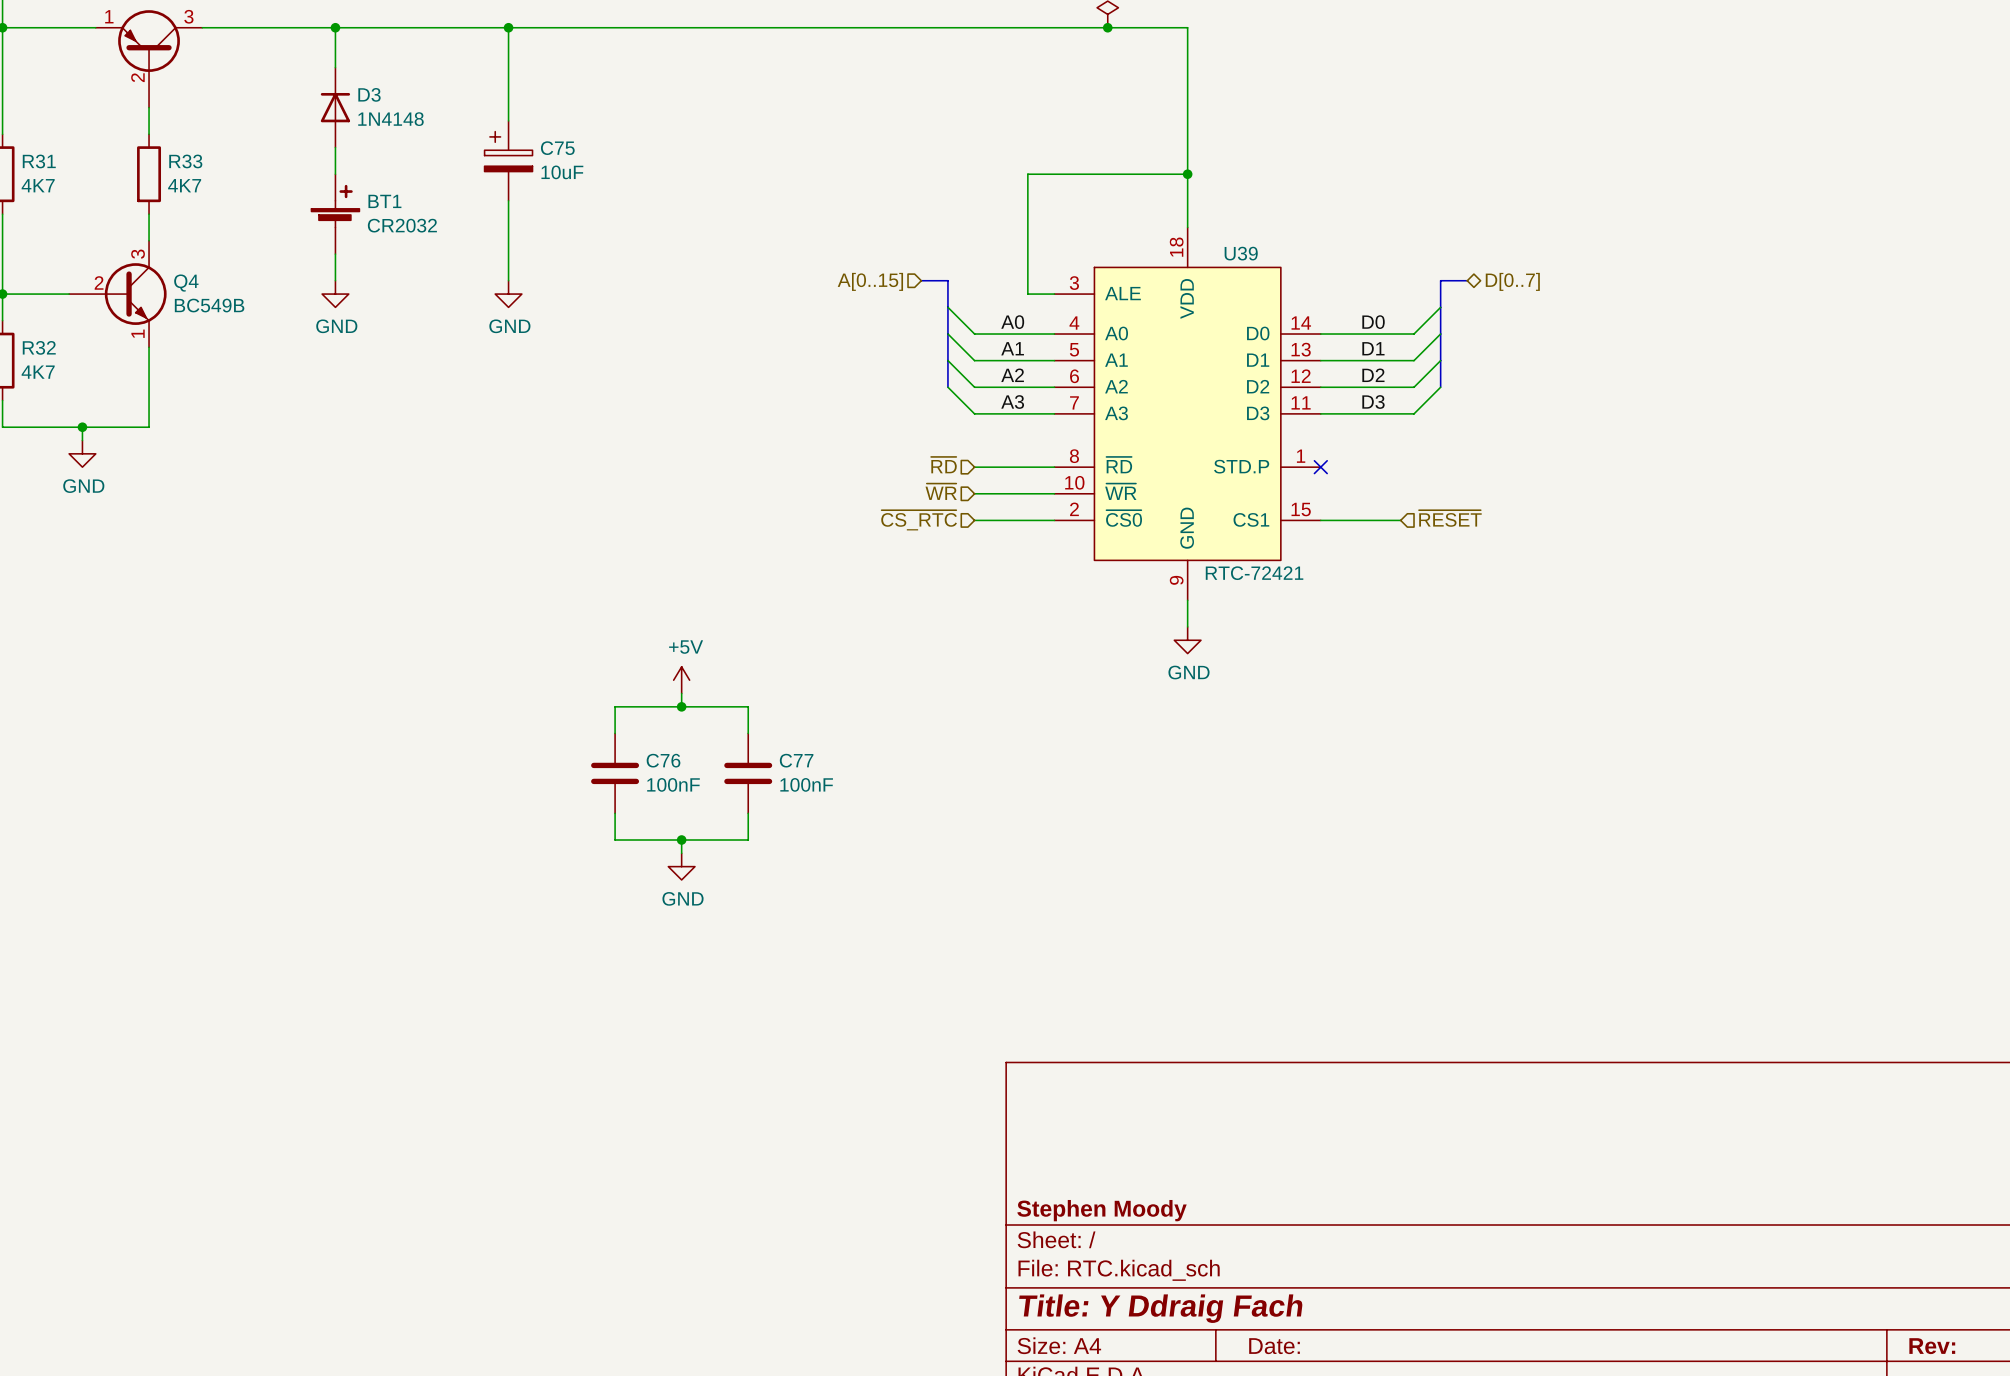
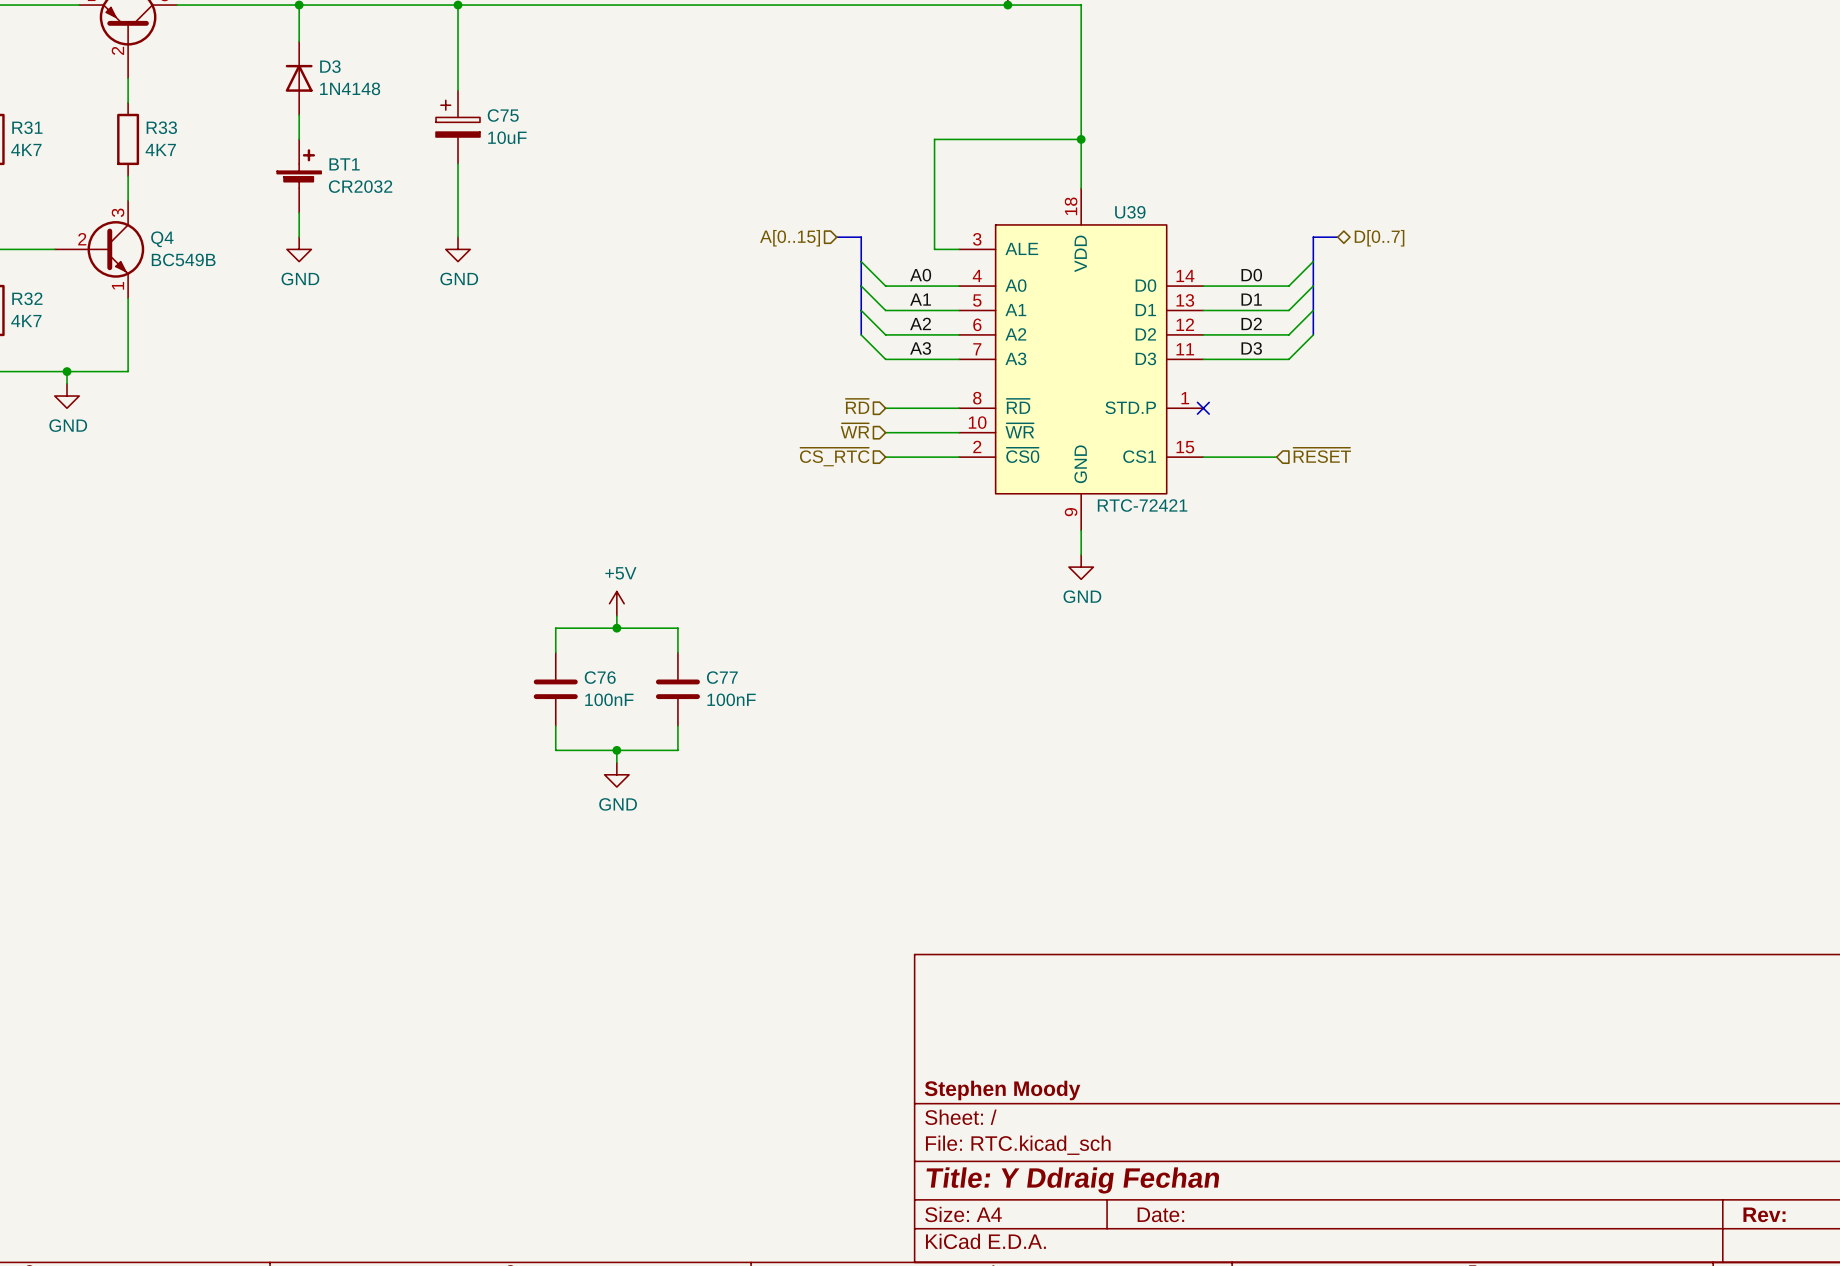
title block: Title: Y Ddraig Fach (1160, 1308) -> Title: Y Ddraig Fechan (1072, 1180)

